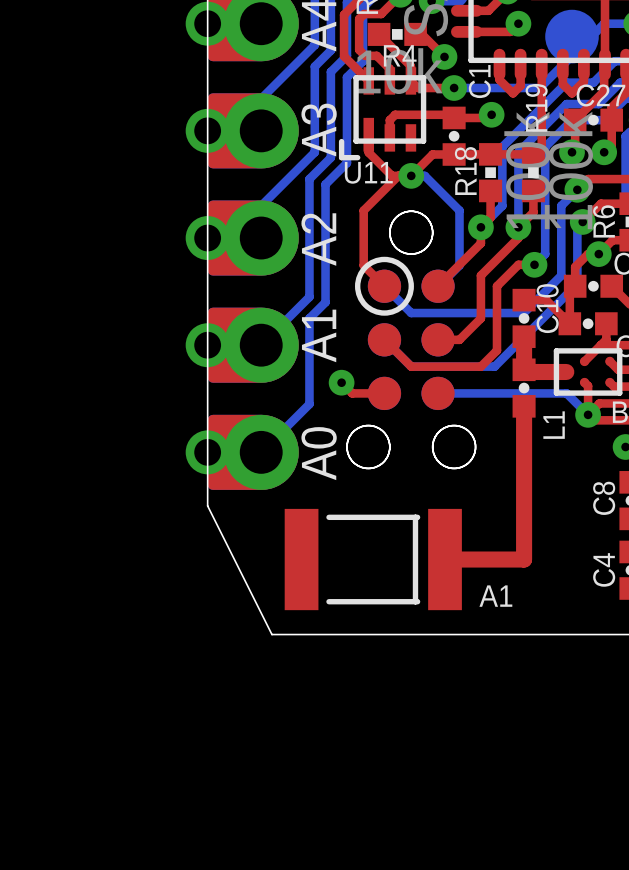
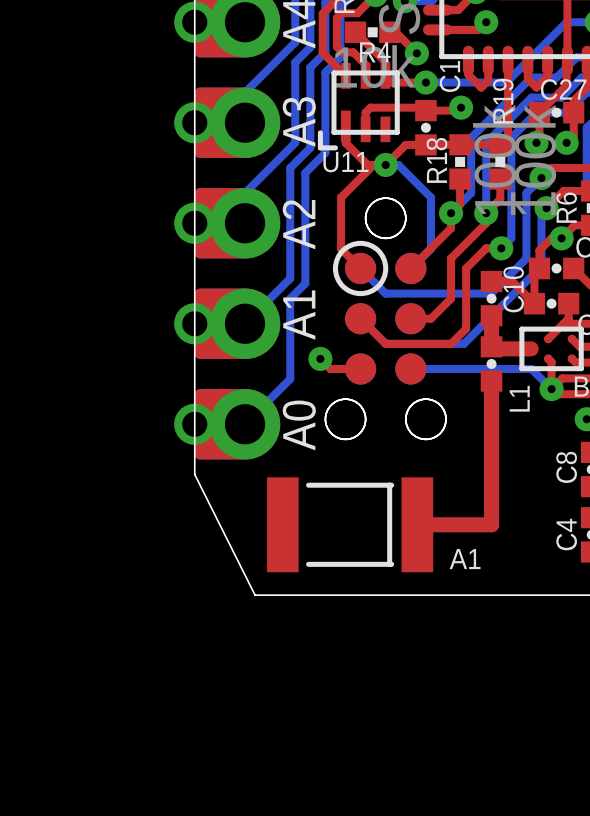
part: (572, 36) -> none

